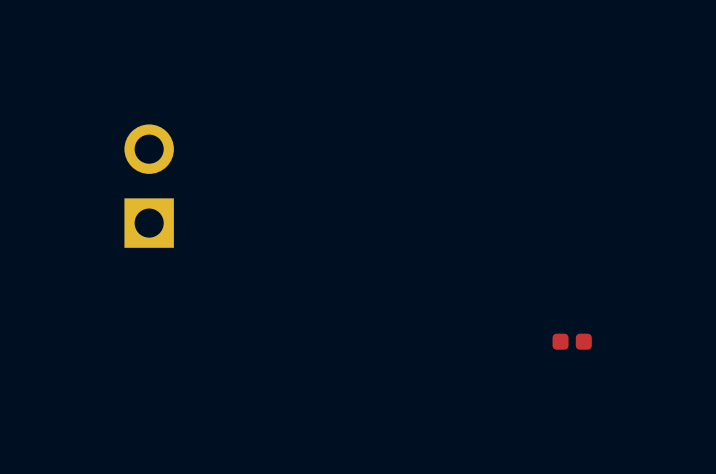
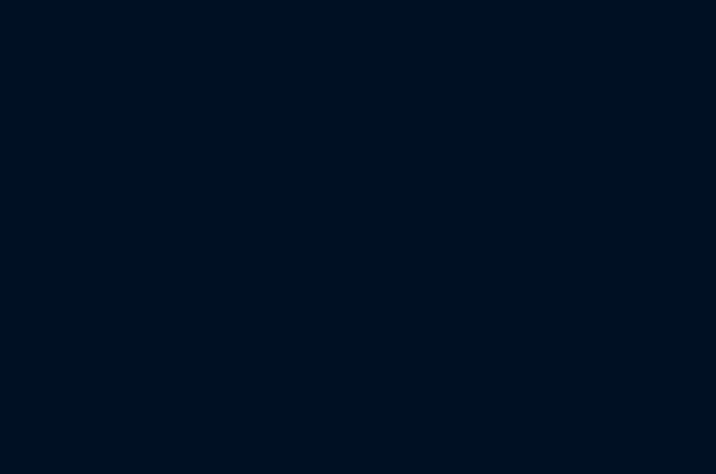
part: (149, 186) -> none
part: (572, 341) -> none

